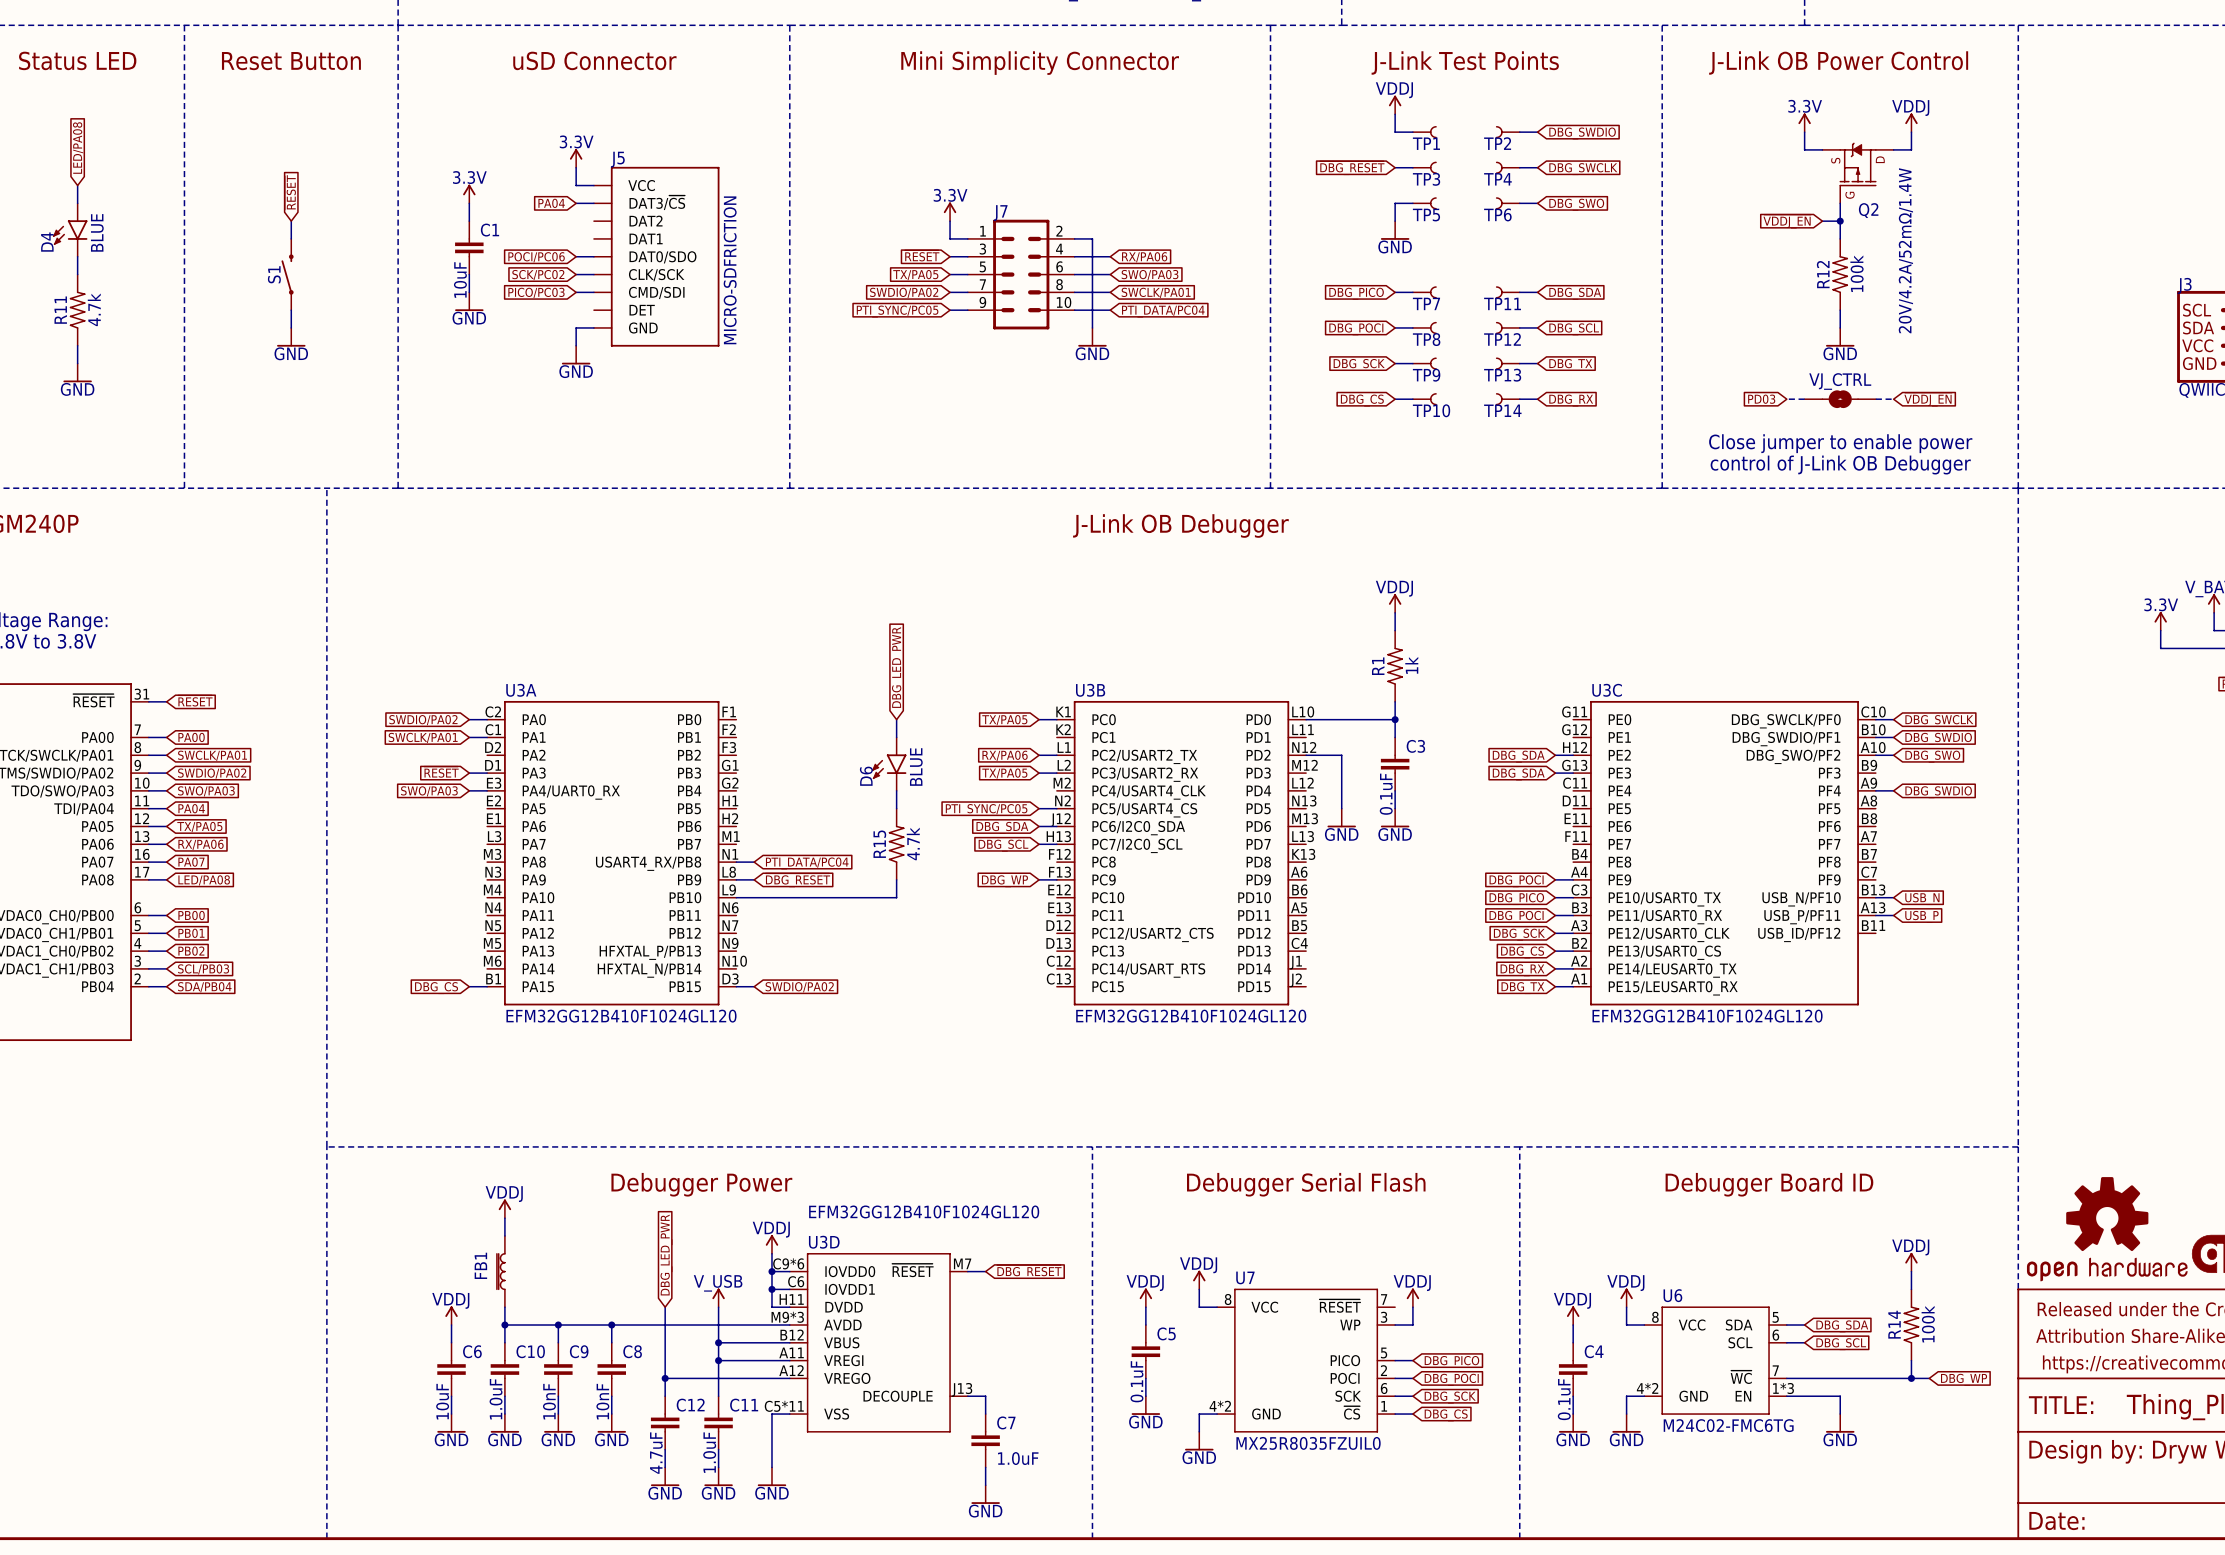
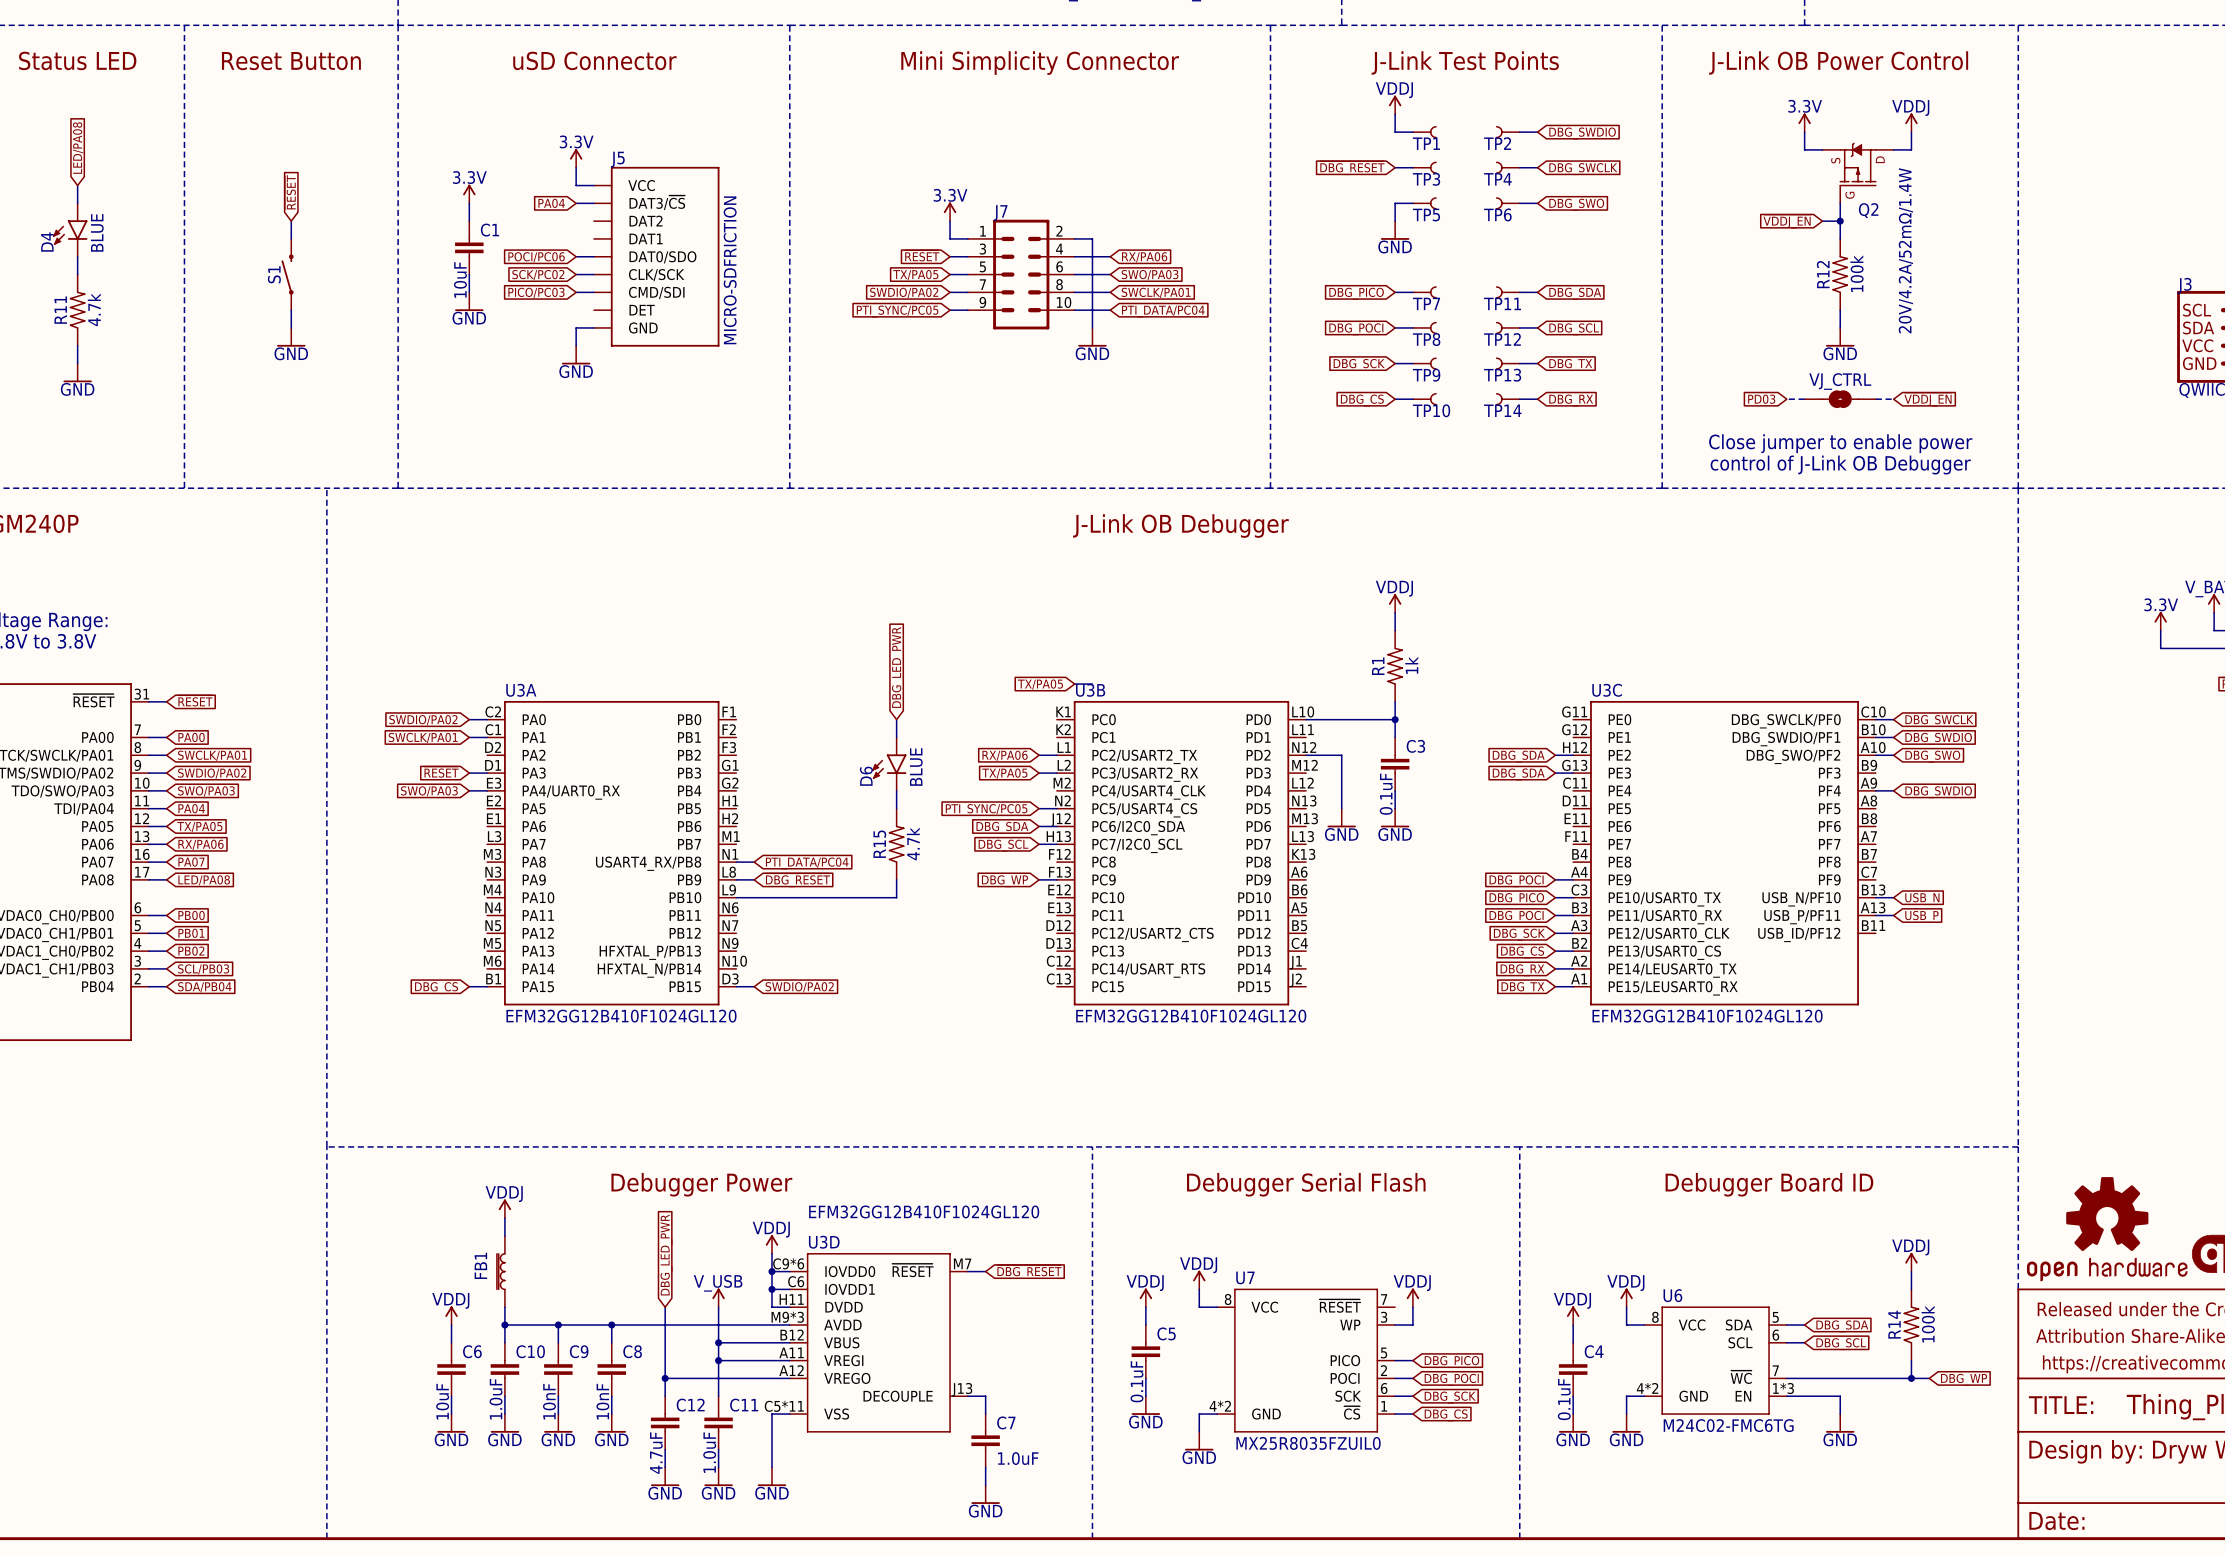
wire: (1039, 719) (1056, 719) -> (1074, 684) (1092, 684)
global label position: TX/PA05 (1004, 720) -> TX/PA05 (1040, 684)

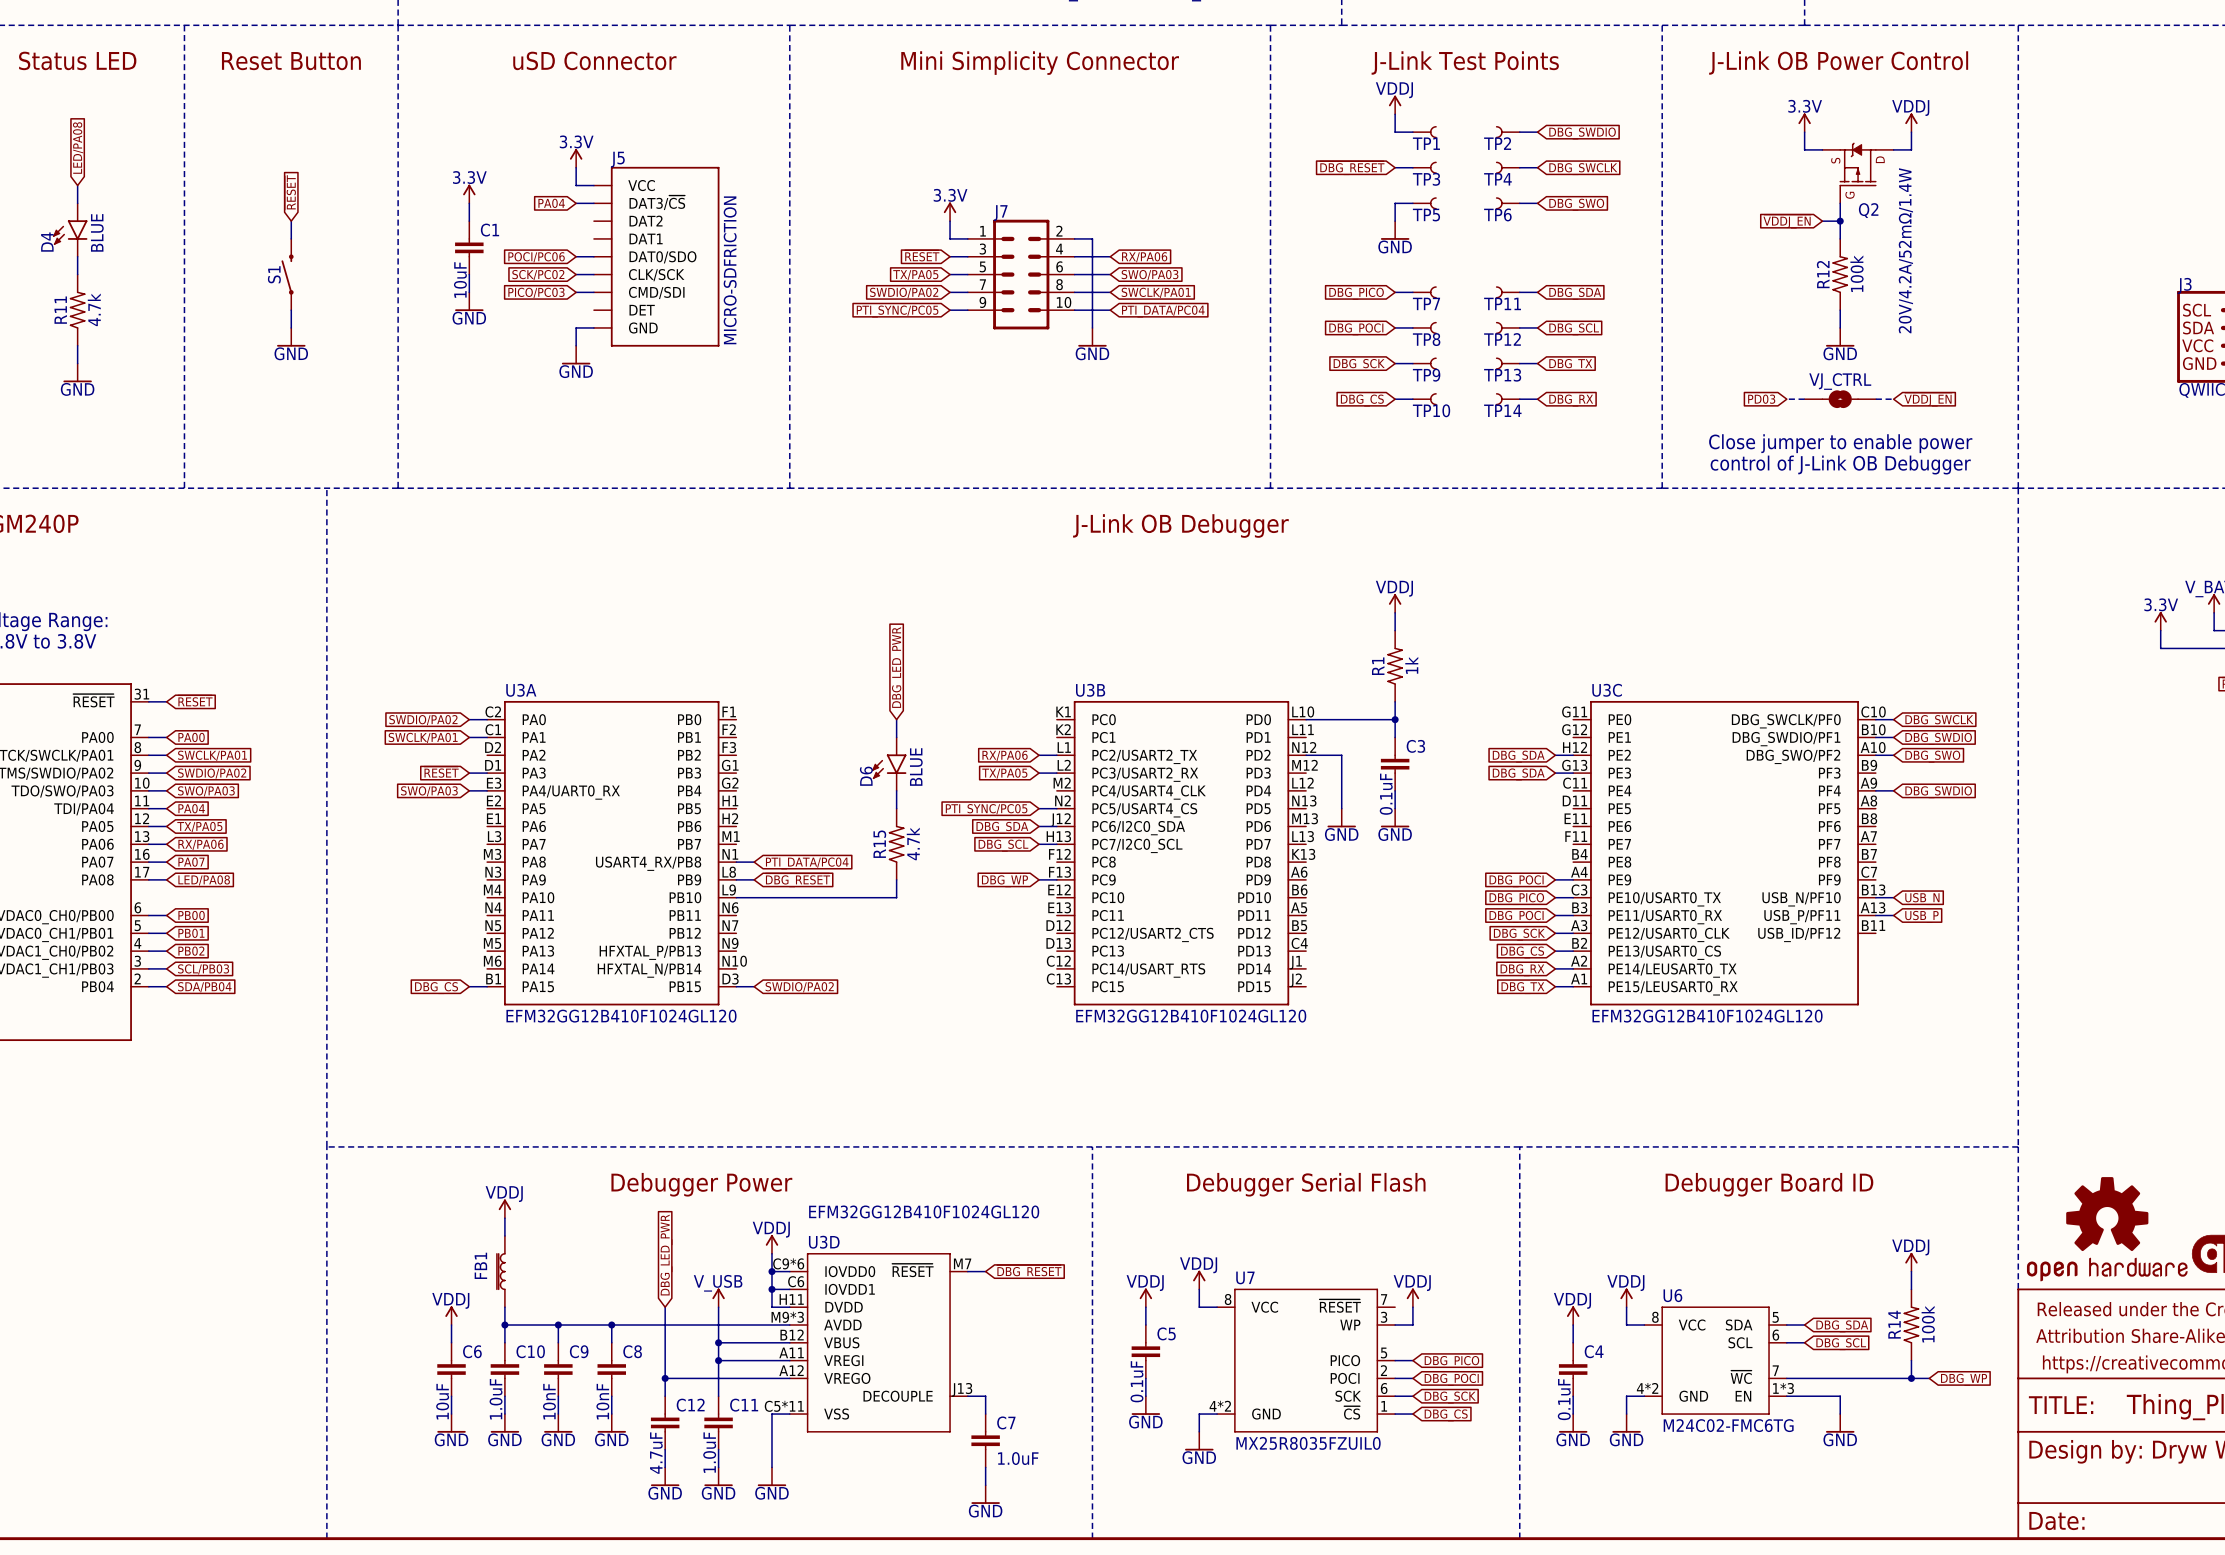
global label: TX/PA05 (1040, 684) -> none
wire: (1074, 684) (1092, 684) -> none

